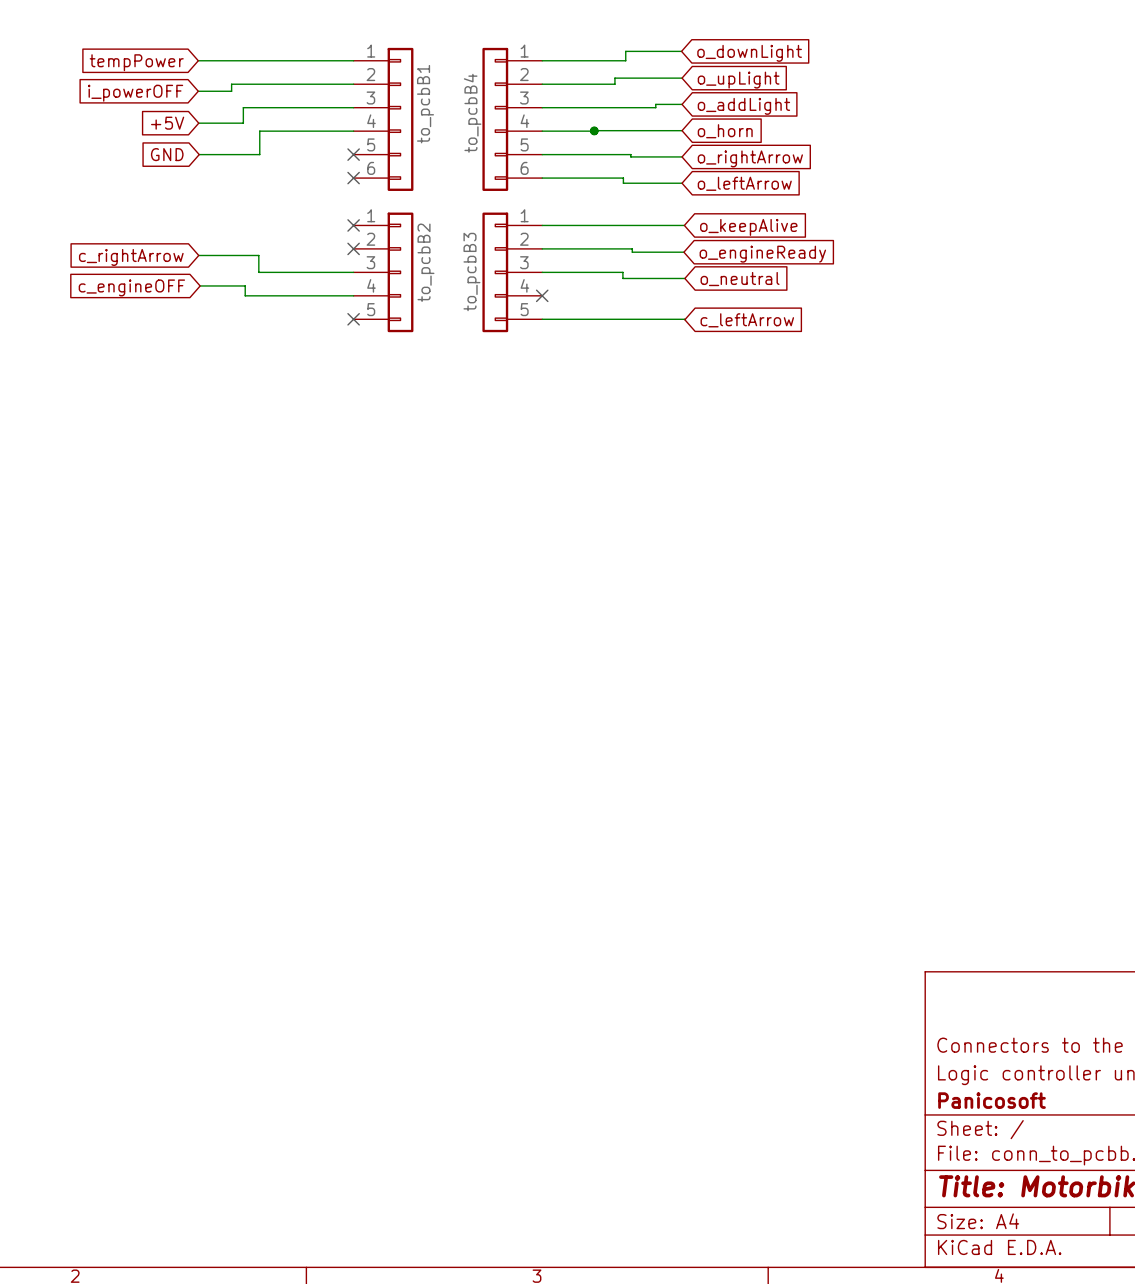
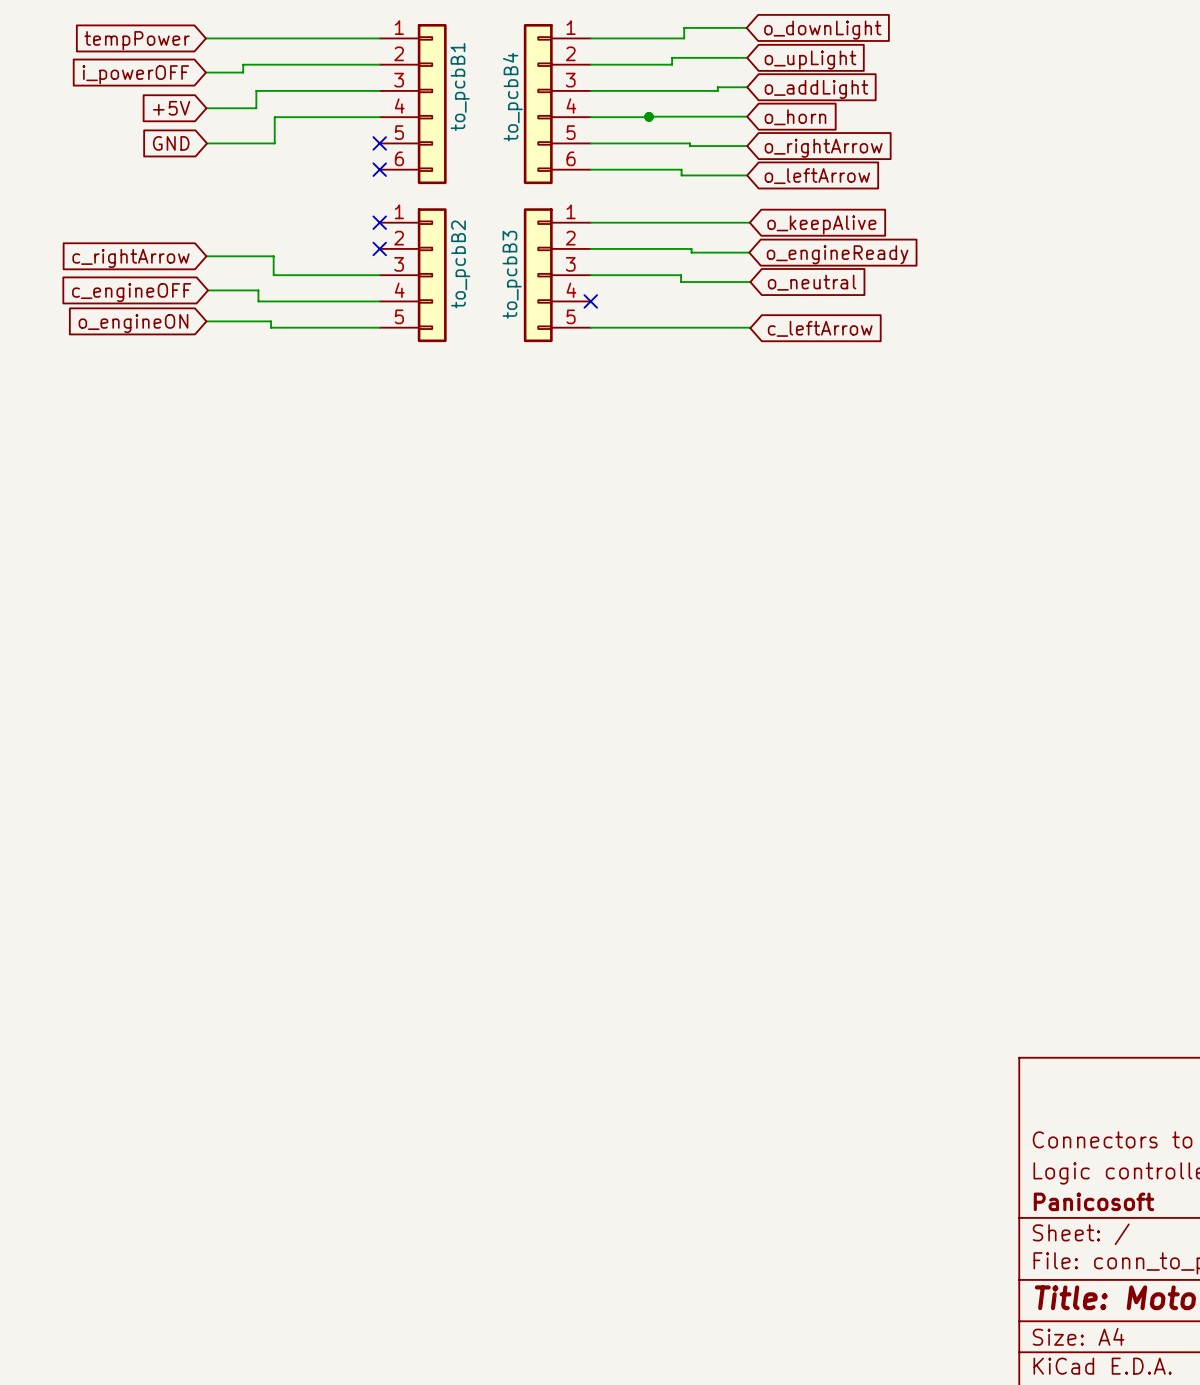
wire: none -> (206, 321) (271, 321) (271, 327) (379, 327)
global label: none -> o_engineON (133, 323)
no-connect mark: (353, 319) -> none

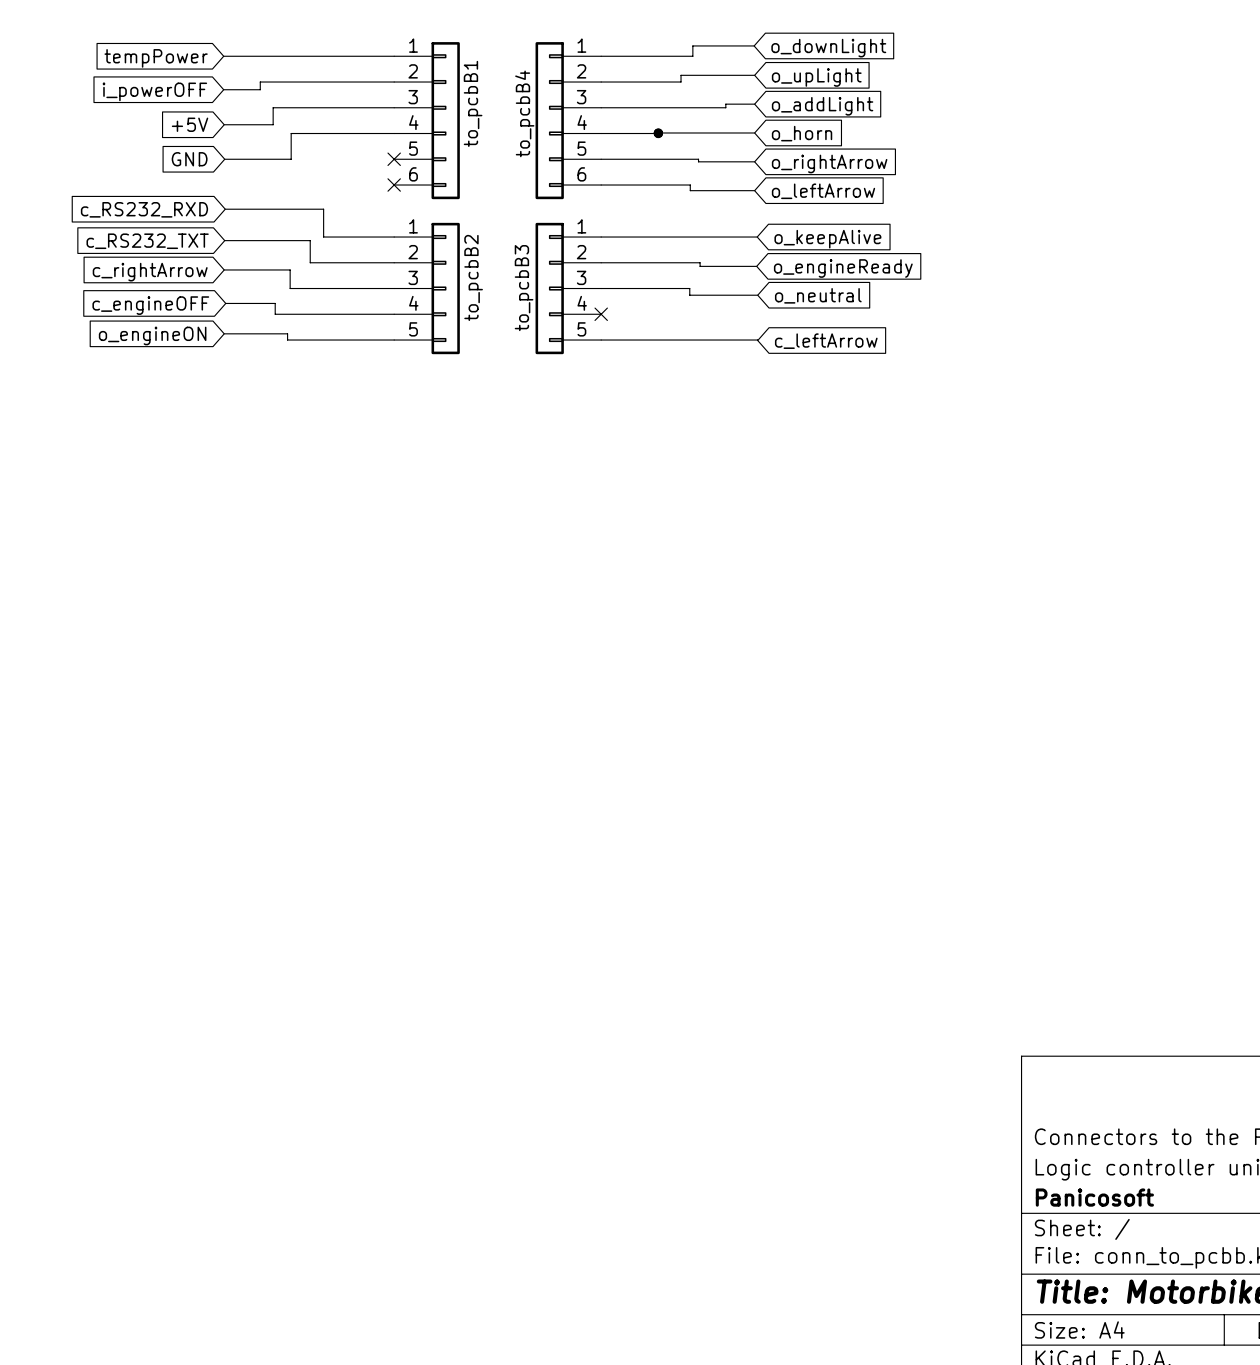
global label: none -> c_RS232_RXD (144, 209)
wire: none -> (225, 209) (323, 209) (323, 237) (394, 237)
no-connect mark: (379, 222) -> none
wire: none -> (224, 240) (310, 240) (310, 262) (394, 262)
global label: none -> c_RS232_TXT (147, 241)
no-connect mark: (379, 248) -> none

